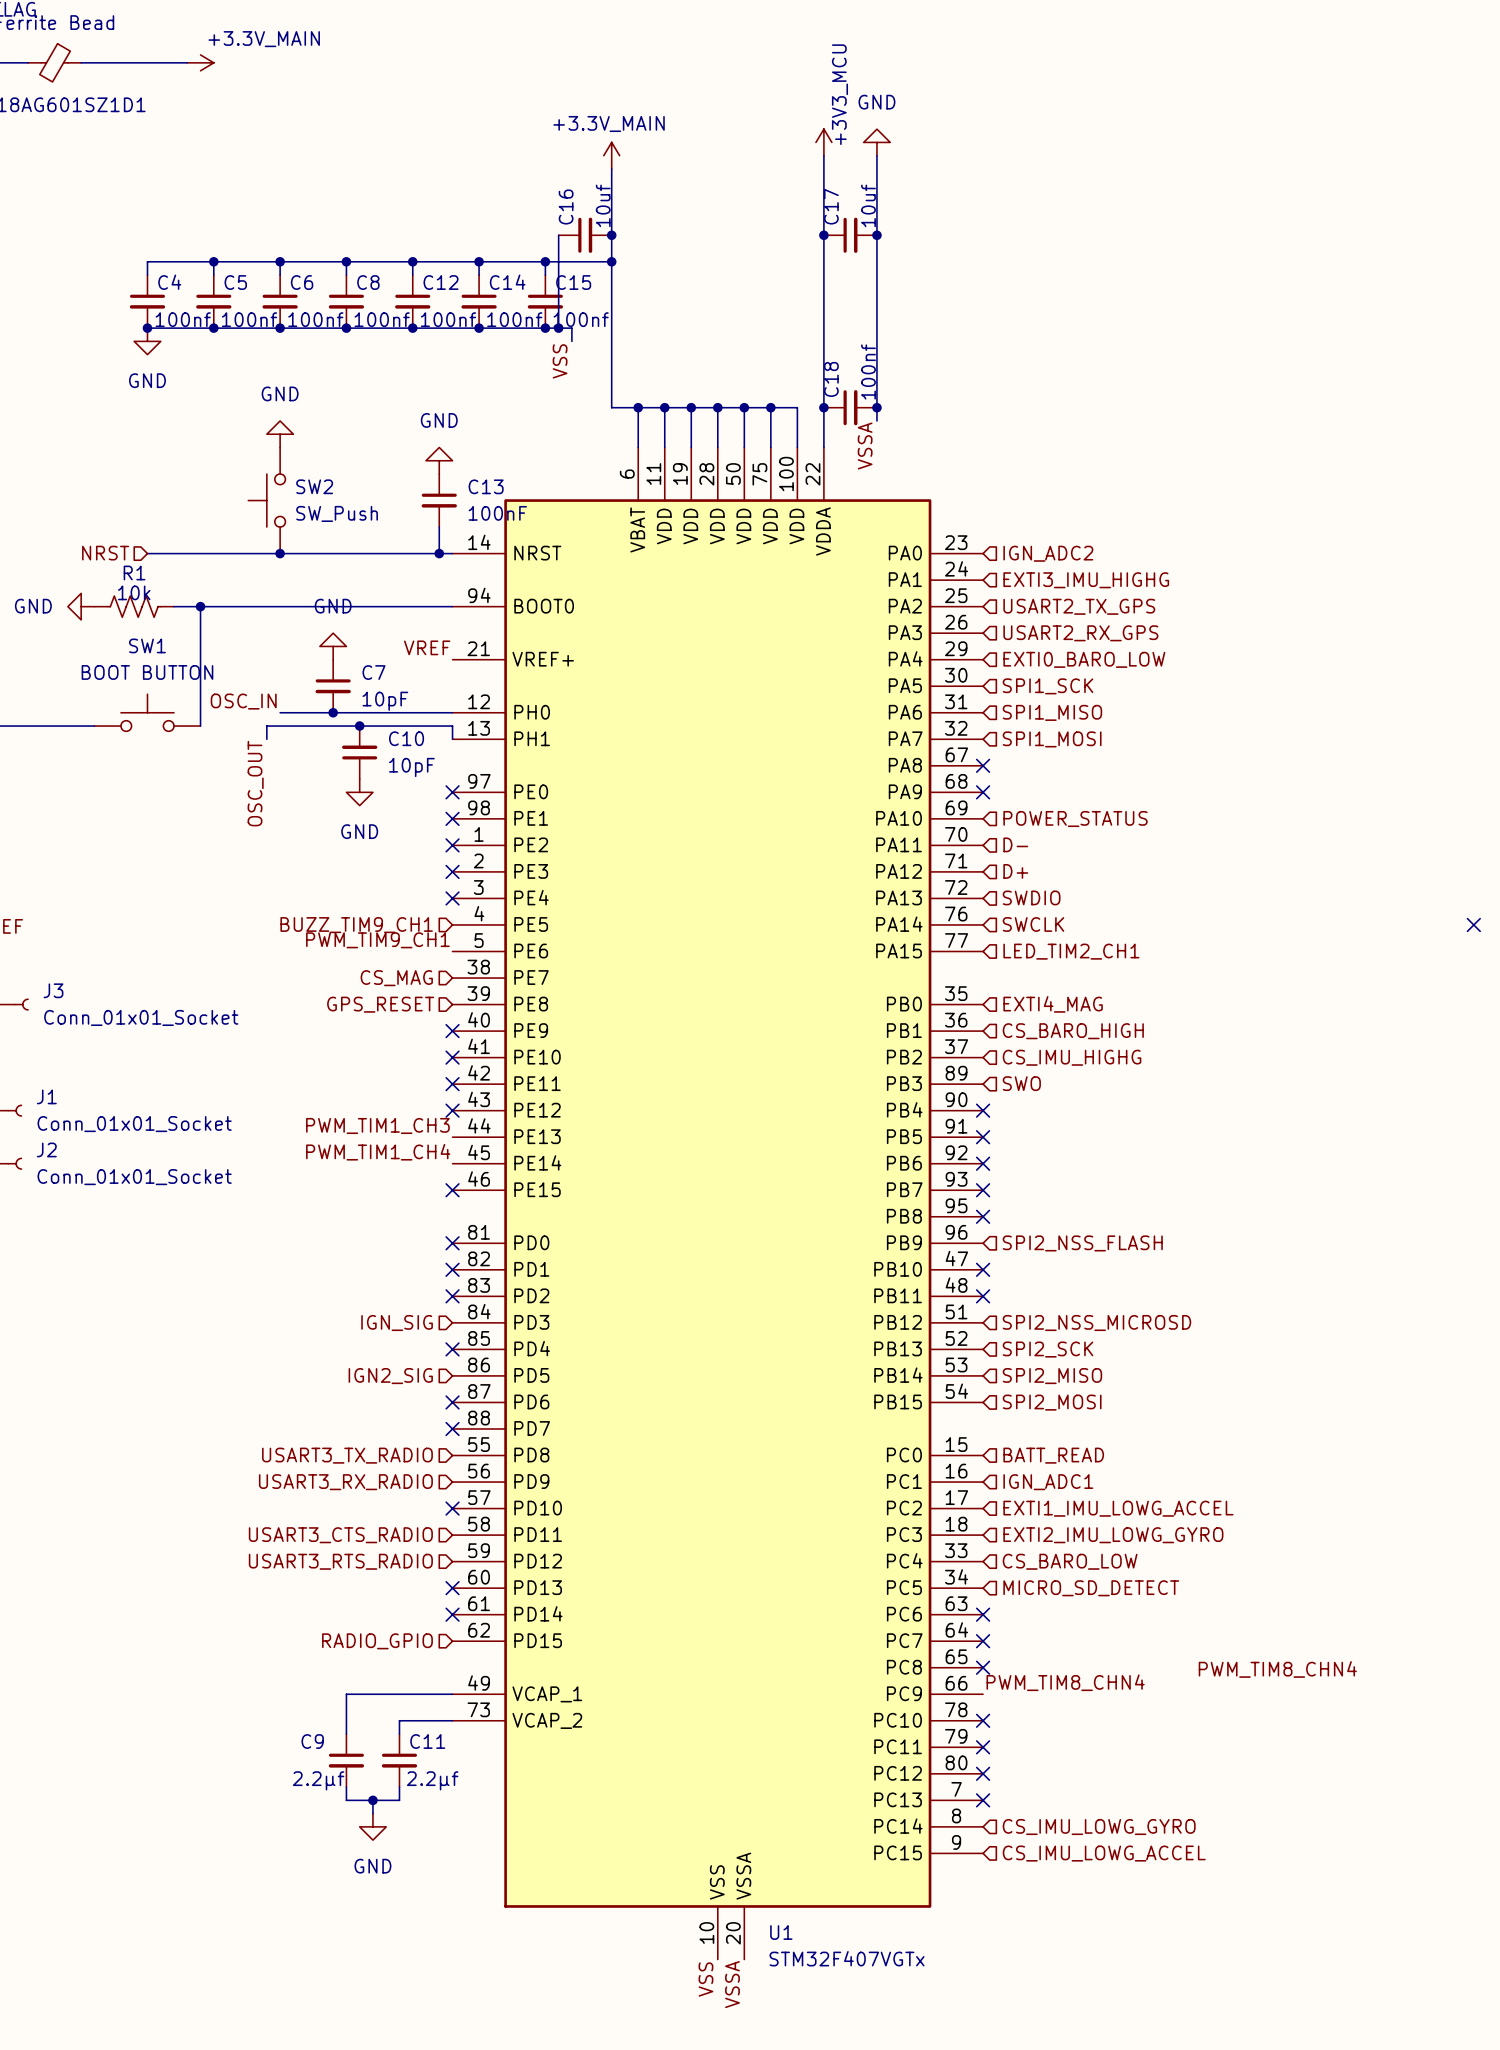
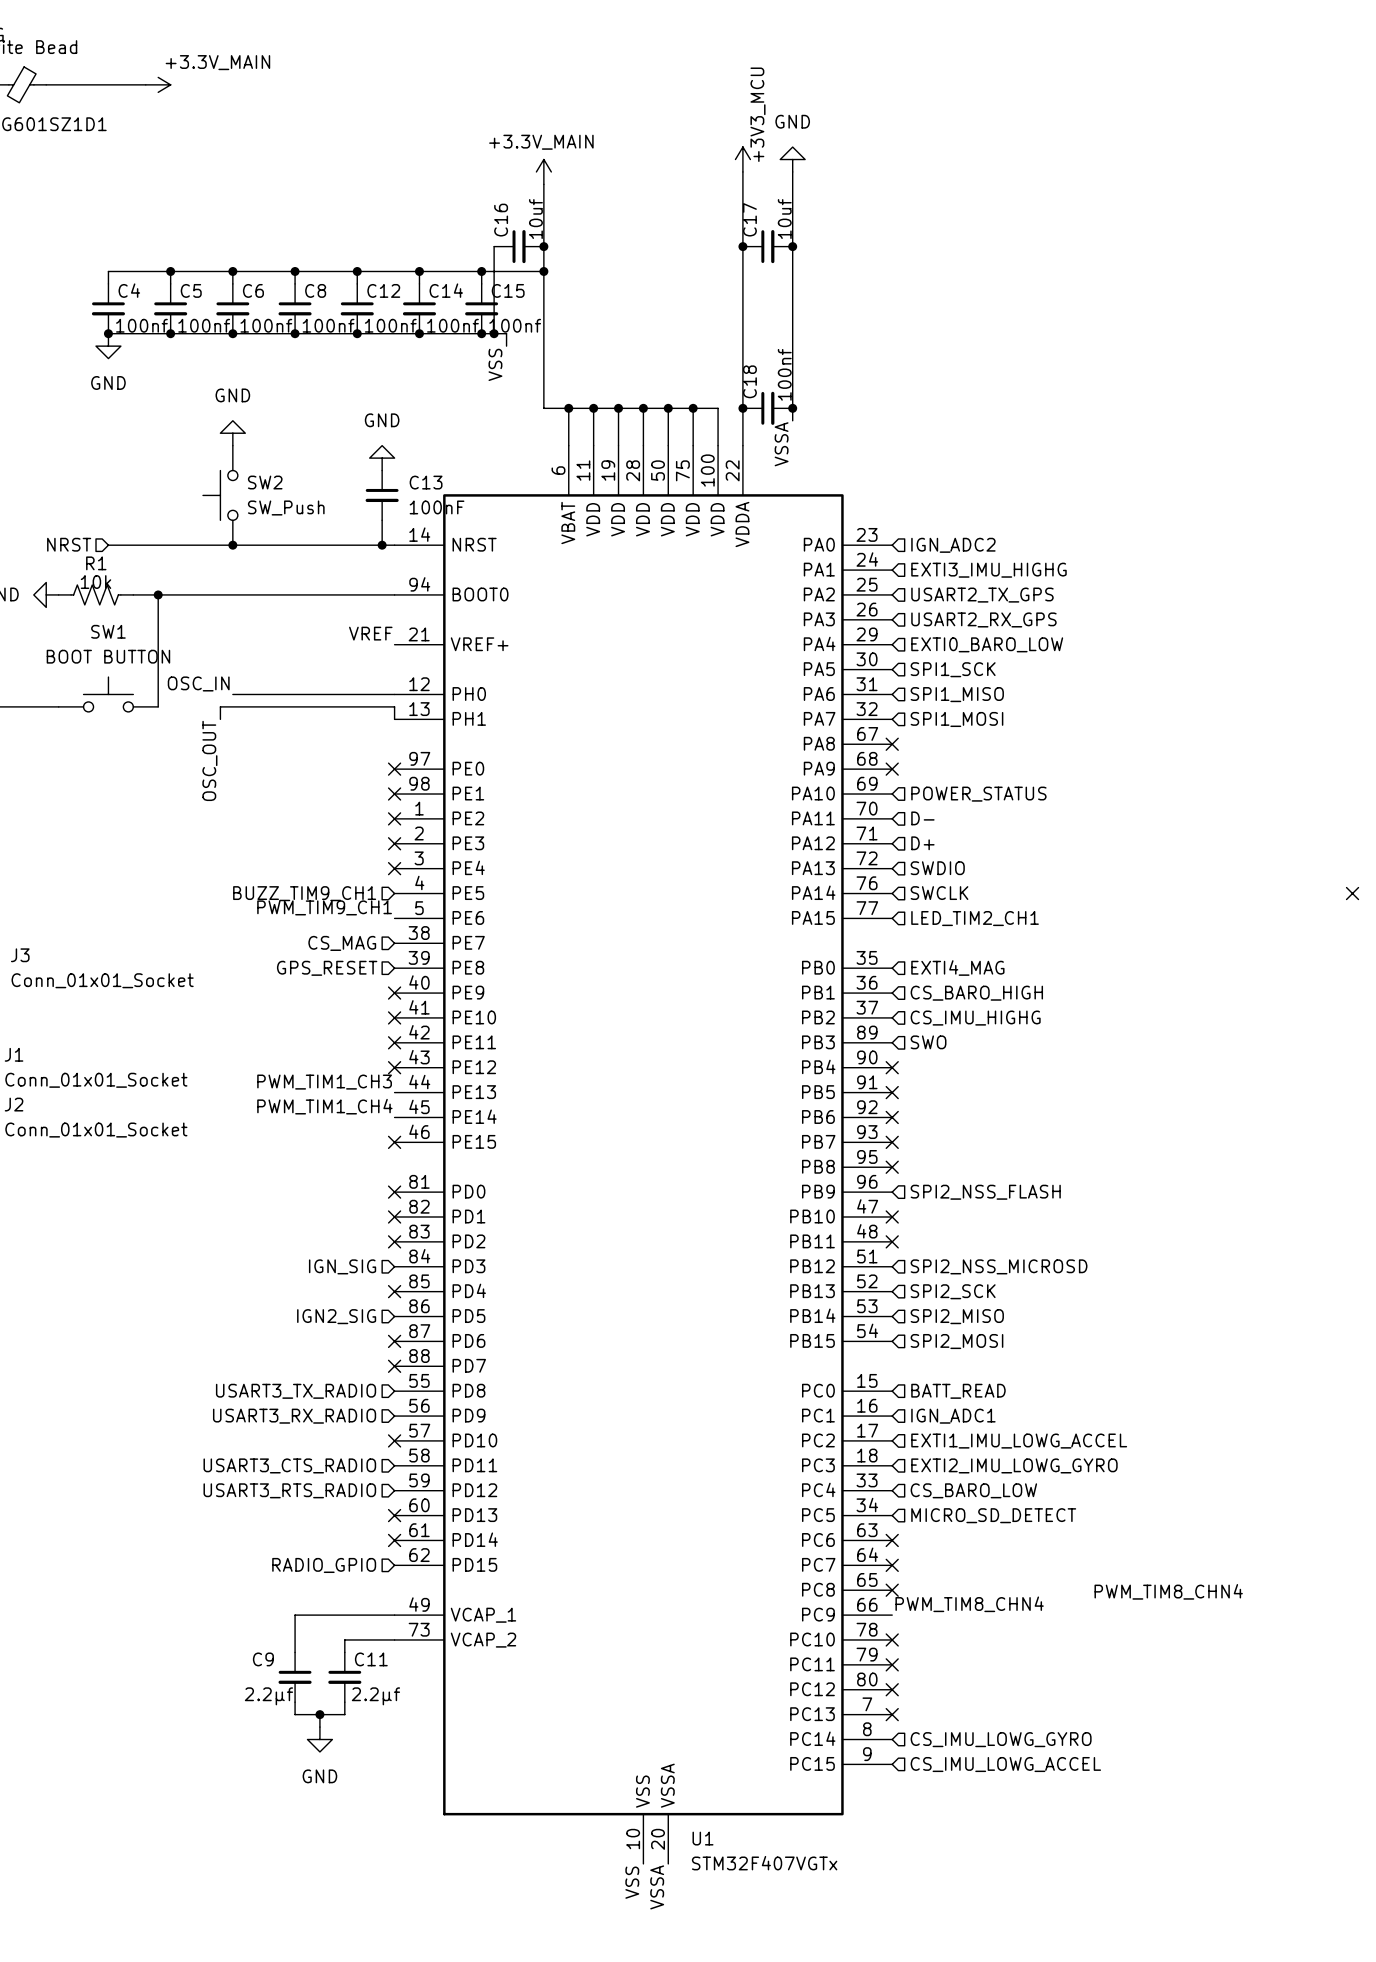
power symbol: GND (333, 646) -> none
C7: 10pF (333, 686) -> none
junction: (333, 712) -> none
junction: (359, 726) -> none
C10: 10pF (359, 752) -> none
power symbol: GND (359, 792) -> none

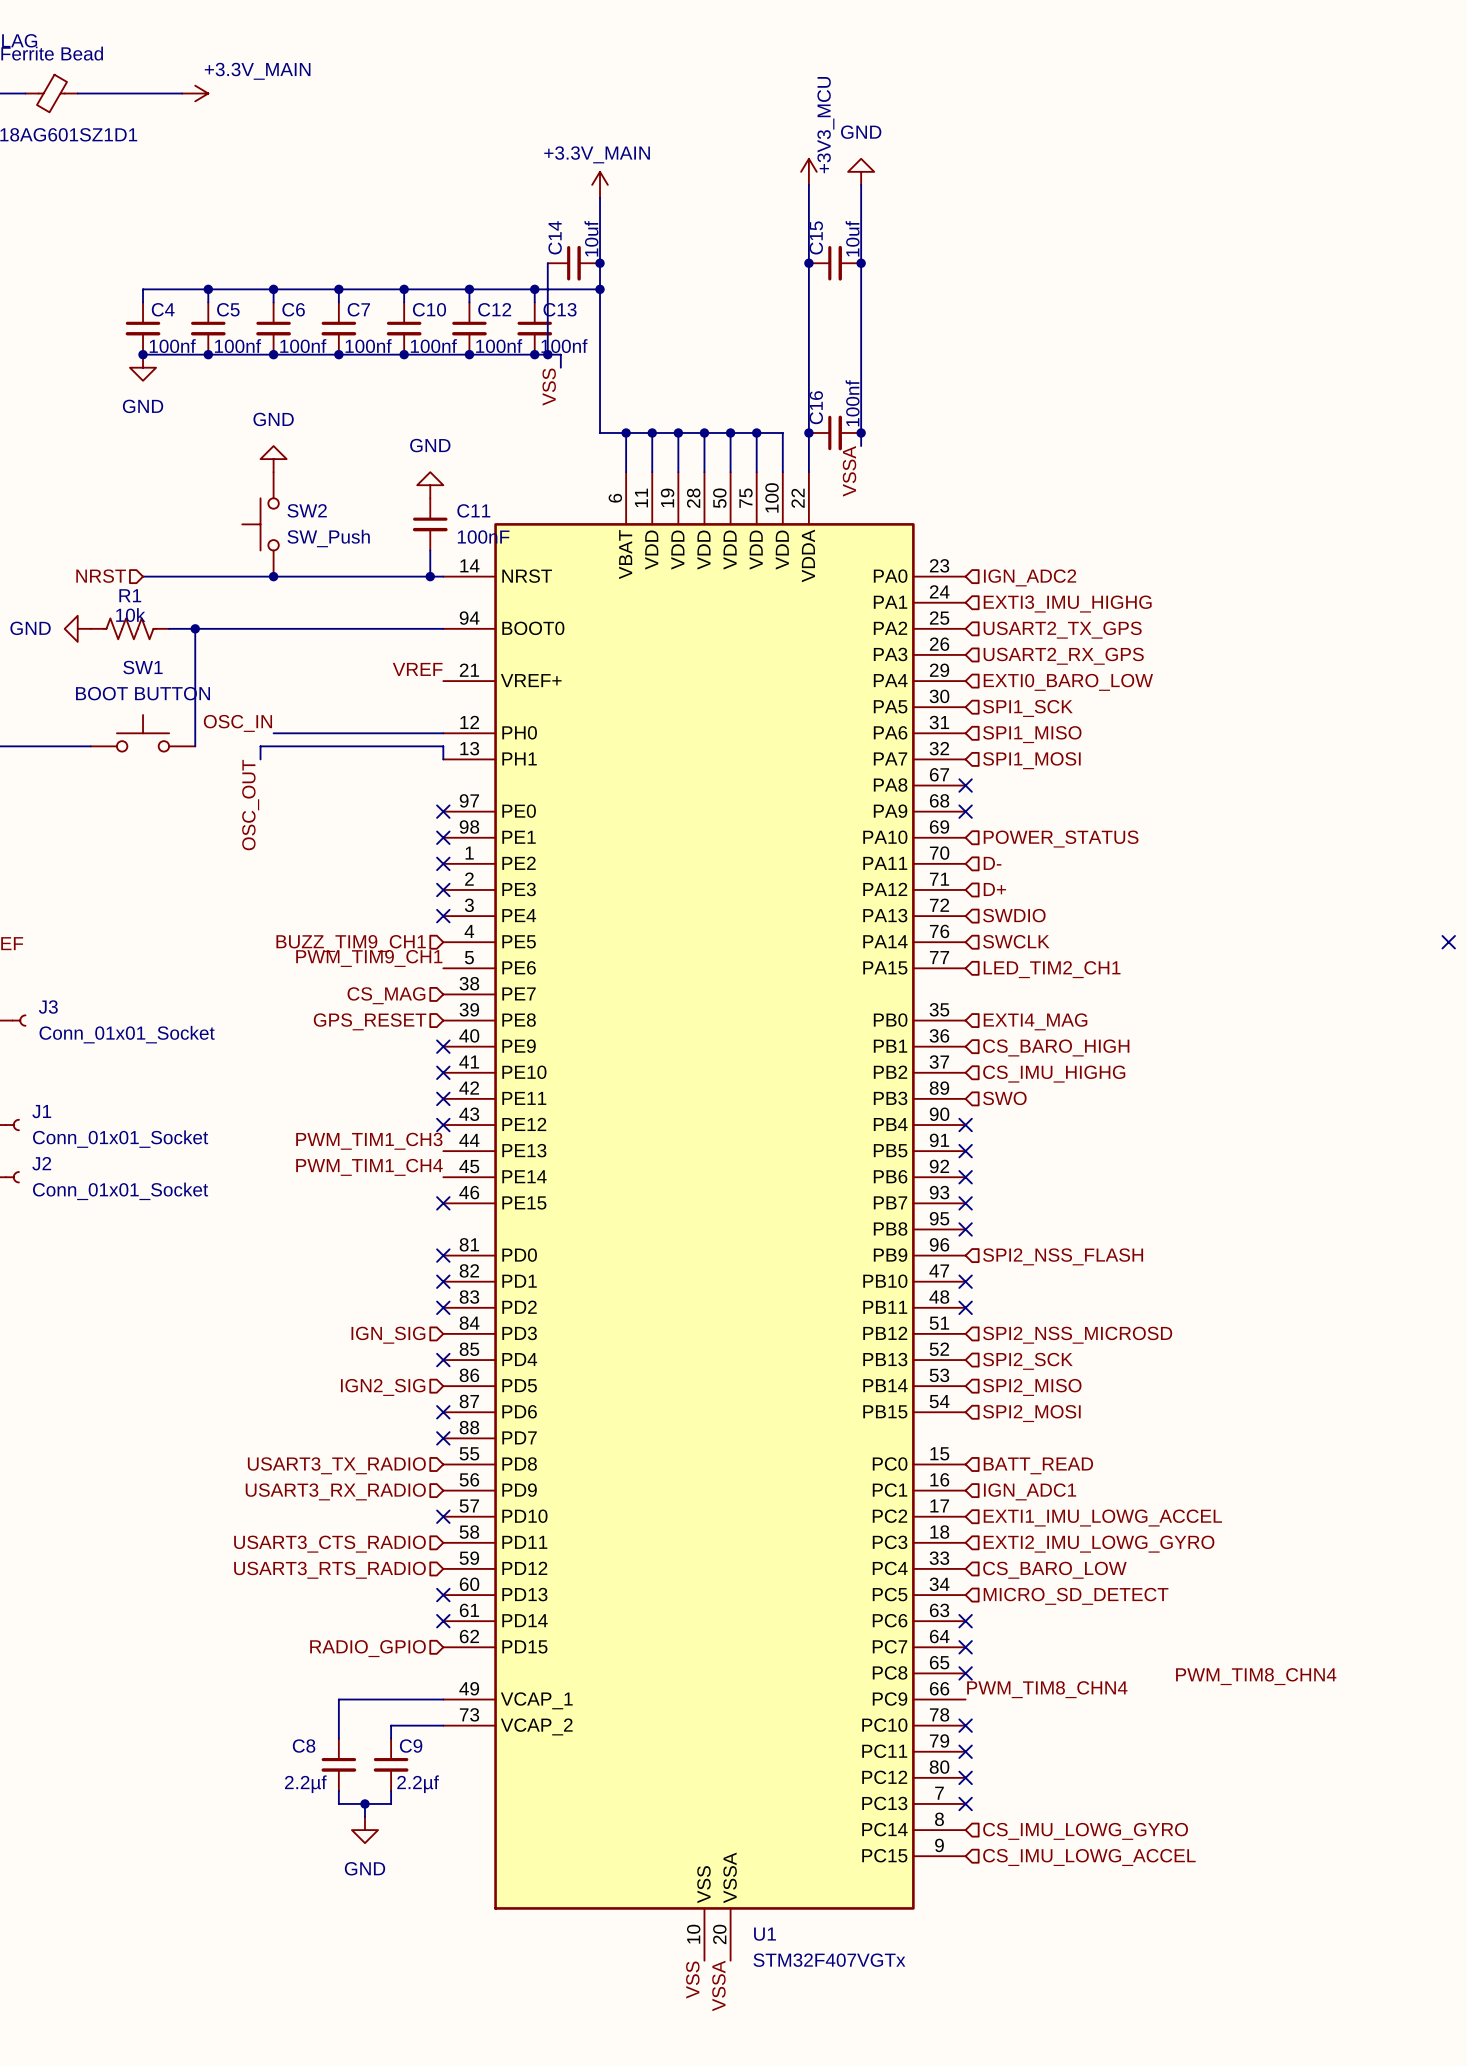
C17 name: C17 (749, 219) -> C15 (816, 237)
C16 name: C16 (501, 220) -> C14 (555, 237)
C8 name: C8 (315, 290) -> C7 (358, 309)
C12 name: C12 (383, 290) -> C10 (429, 309)
C14 name: C14 (446, 290) -> C12 (494, 309)
C15 name: C15 (508, 290) -> C13 (560, 309)
C18 name: C18 (749, 381) -> C16 (816, 407)
C13 name: C13 (426, 482) -> C11 (473, 510)
C9 name: C9 (263, 1659) -> C8 (304, 1746)
C11 name: C11 (371, 1659) -> C9 (411, 1746)

